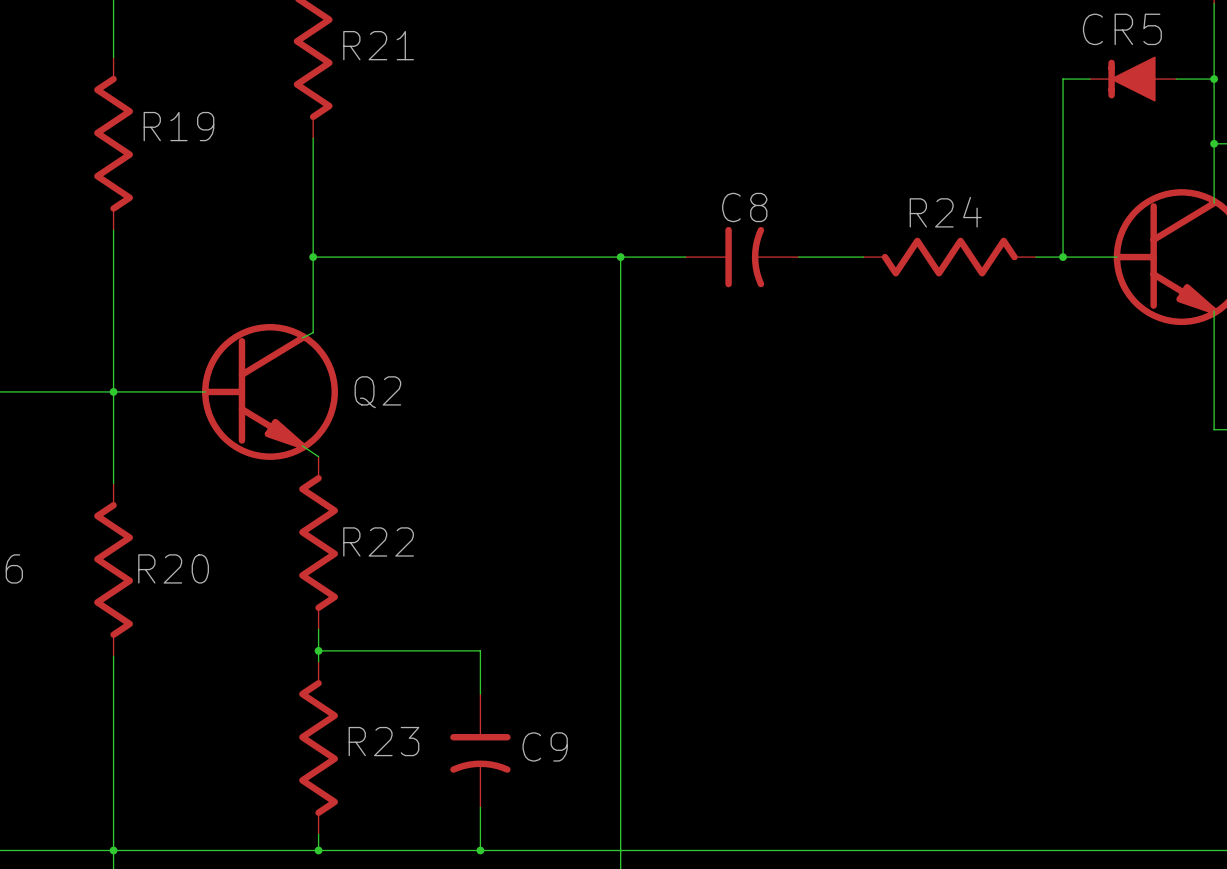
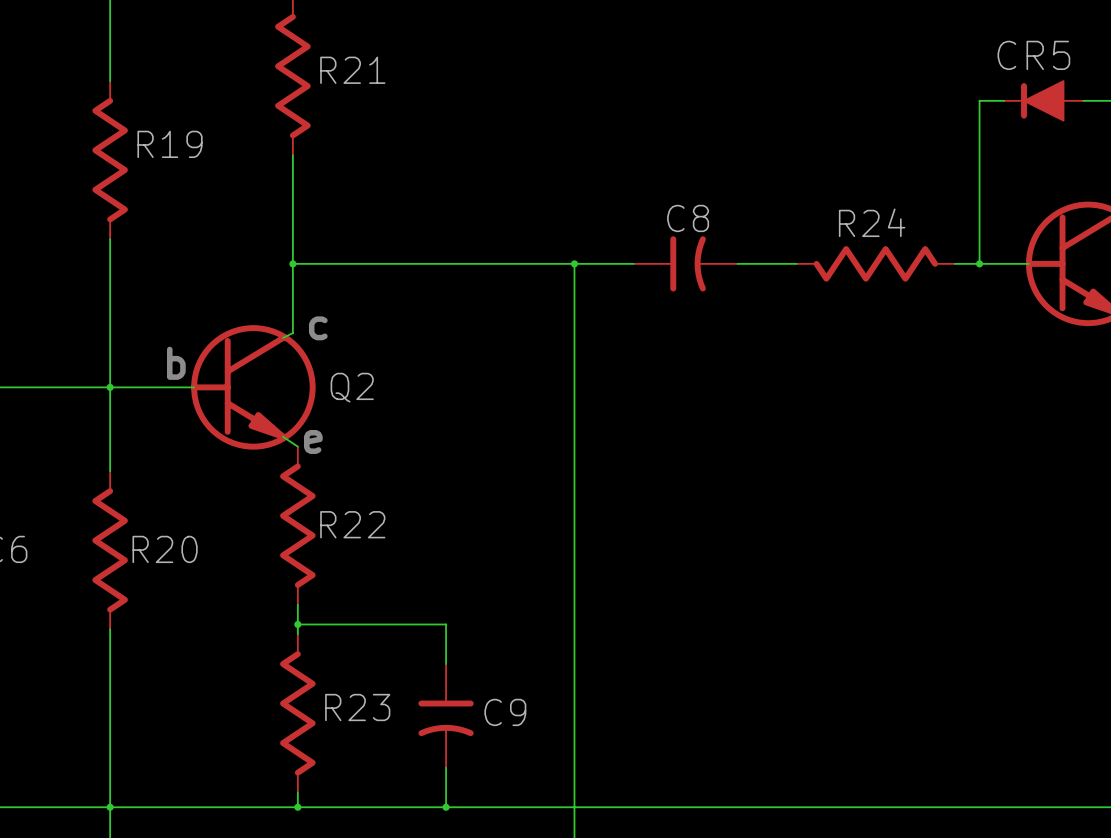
text: none -> c (318, 328)
text: none -> b (176, 363)
text: none -> e (313, 441)

